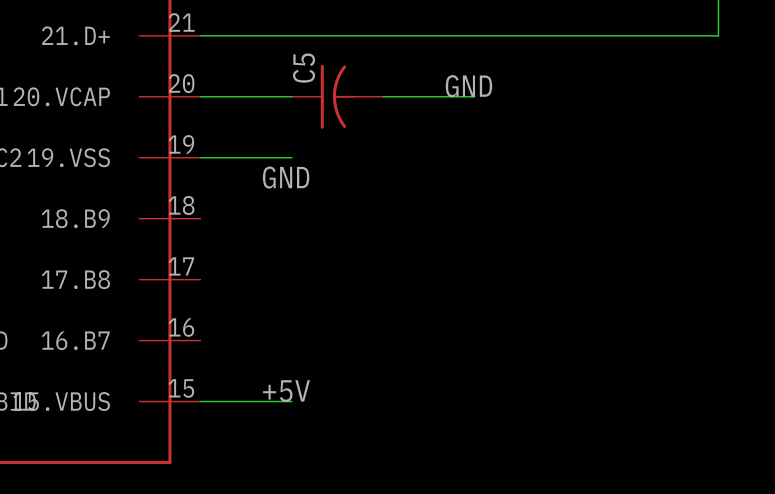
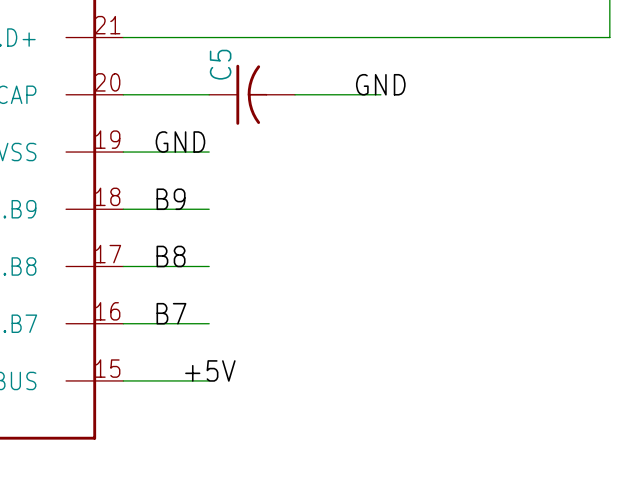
label position: GND (286, 177) -> GND (180, 142)
label: none -> B9 (171, 199)
wire: none -> (123, 209) (209, 209)
label: none -> B8 (171, 256)
wire: none -> (123, 266) (209, 266)
label: none -> B7 (171, 313)
wire: none -> (123, 323) (209, 323)

